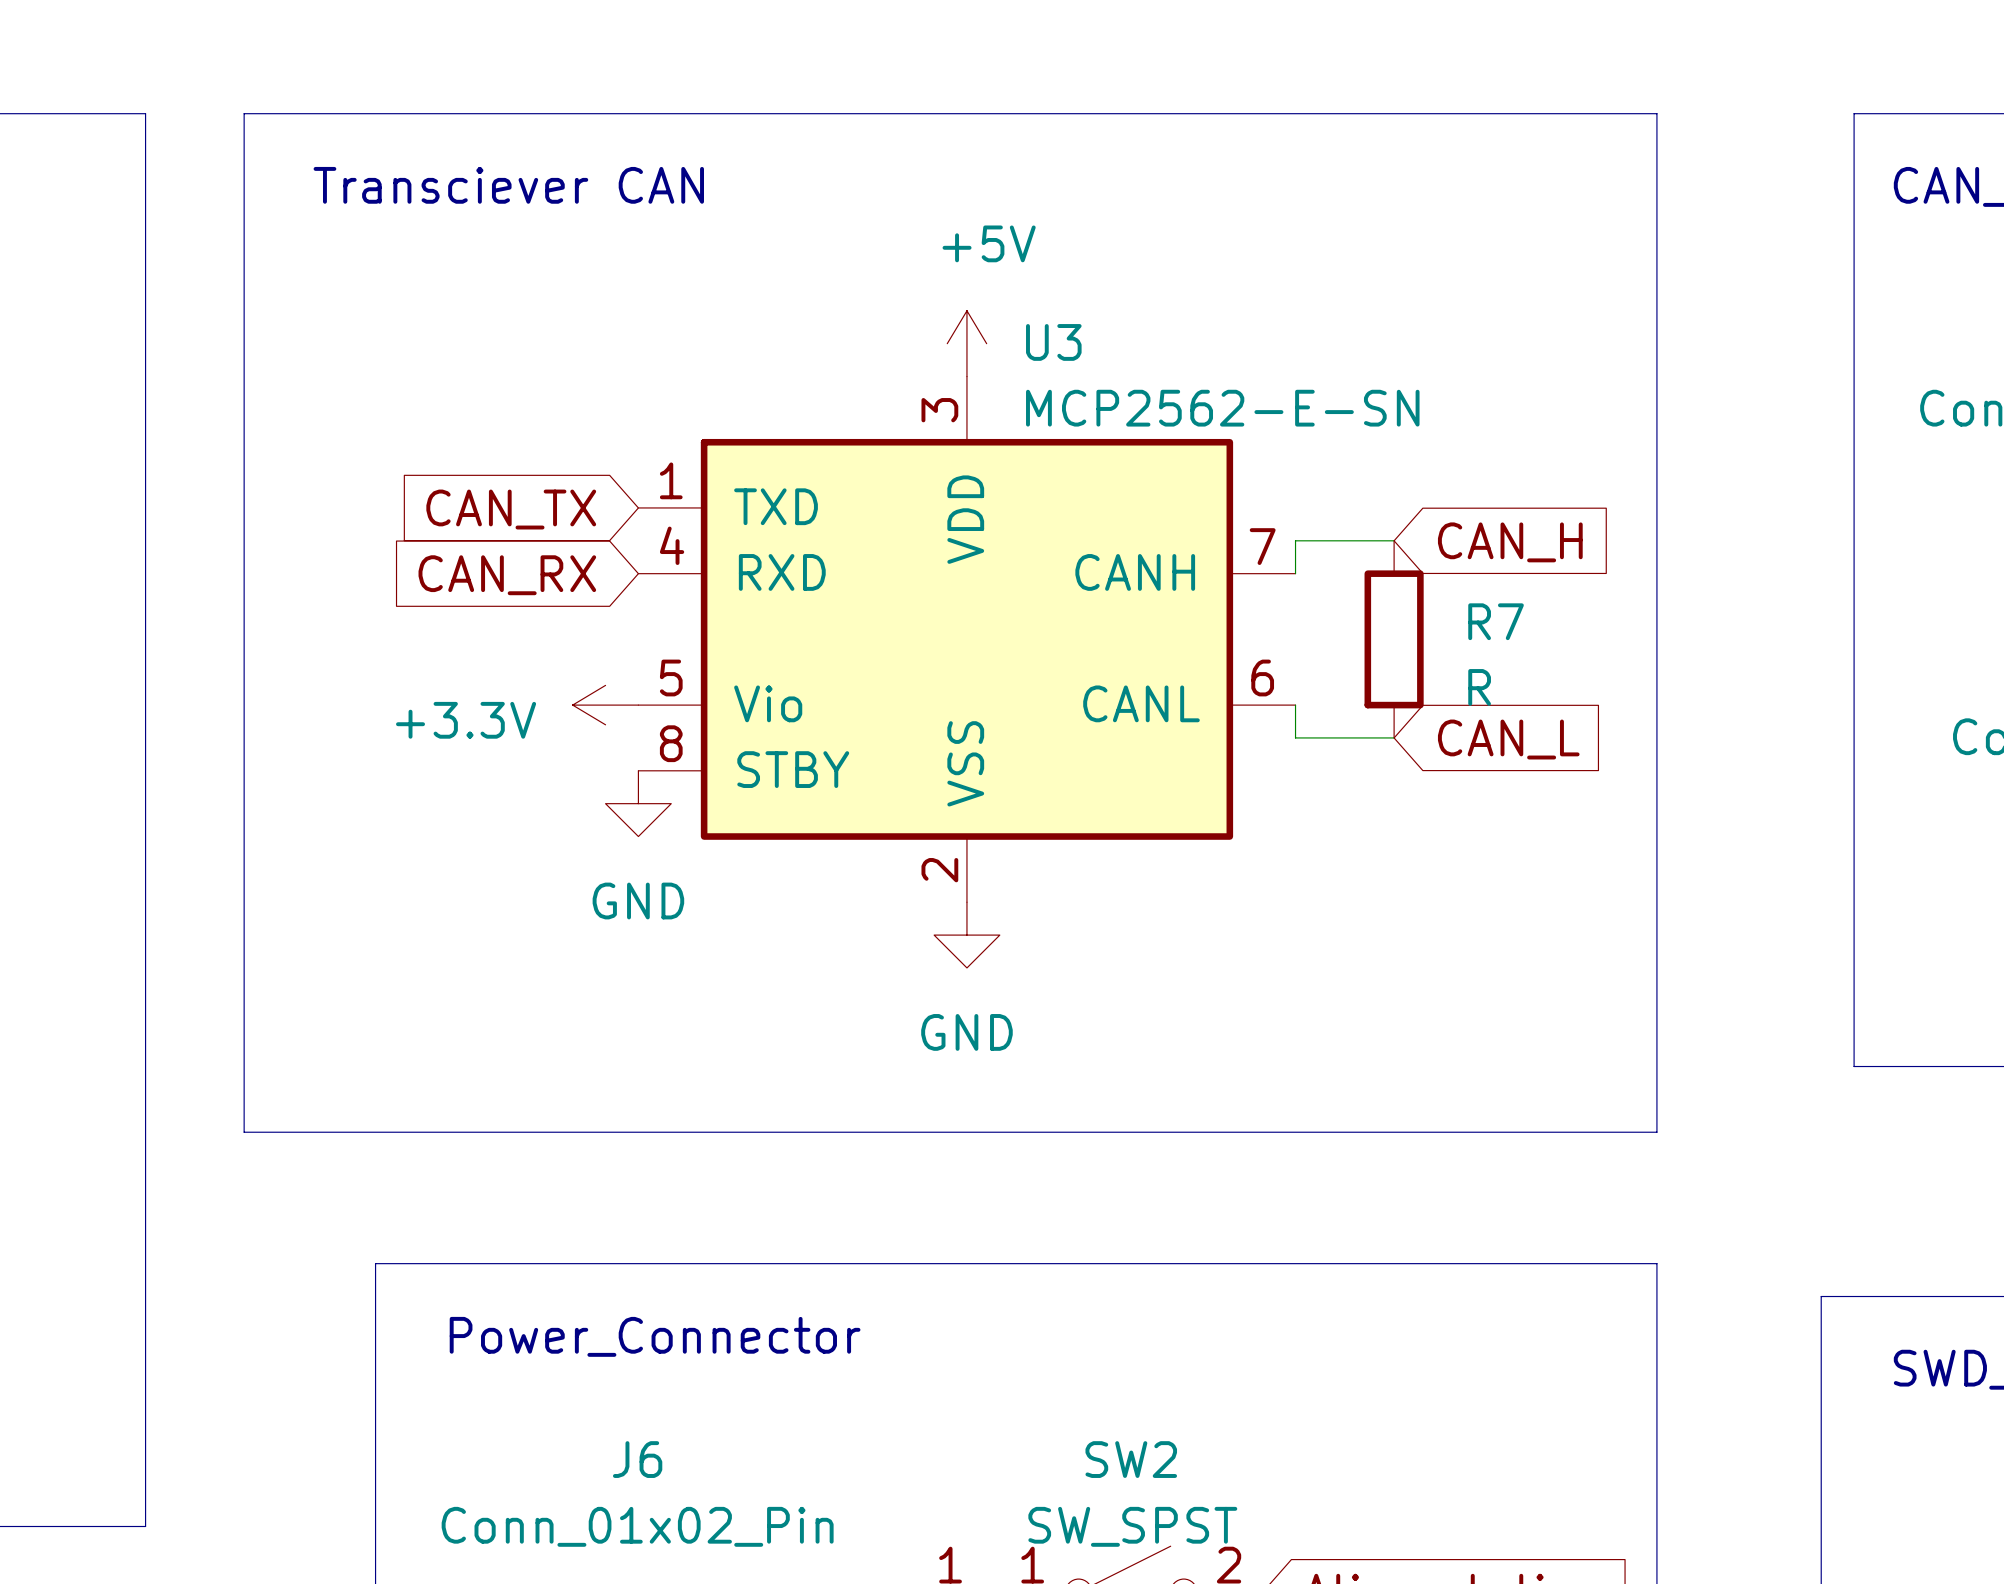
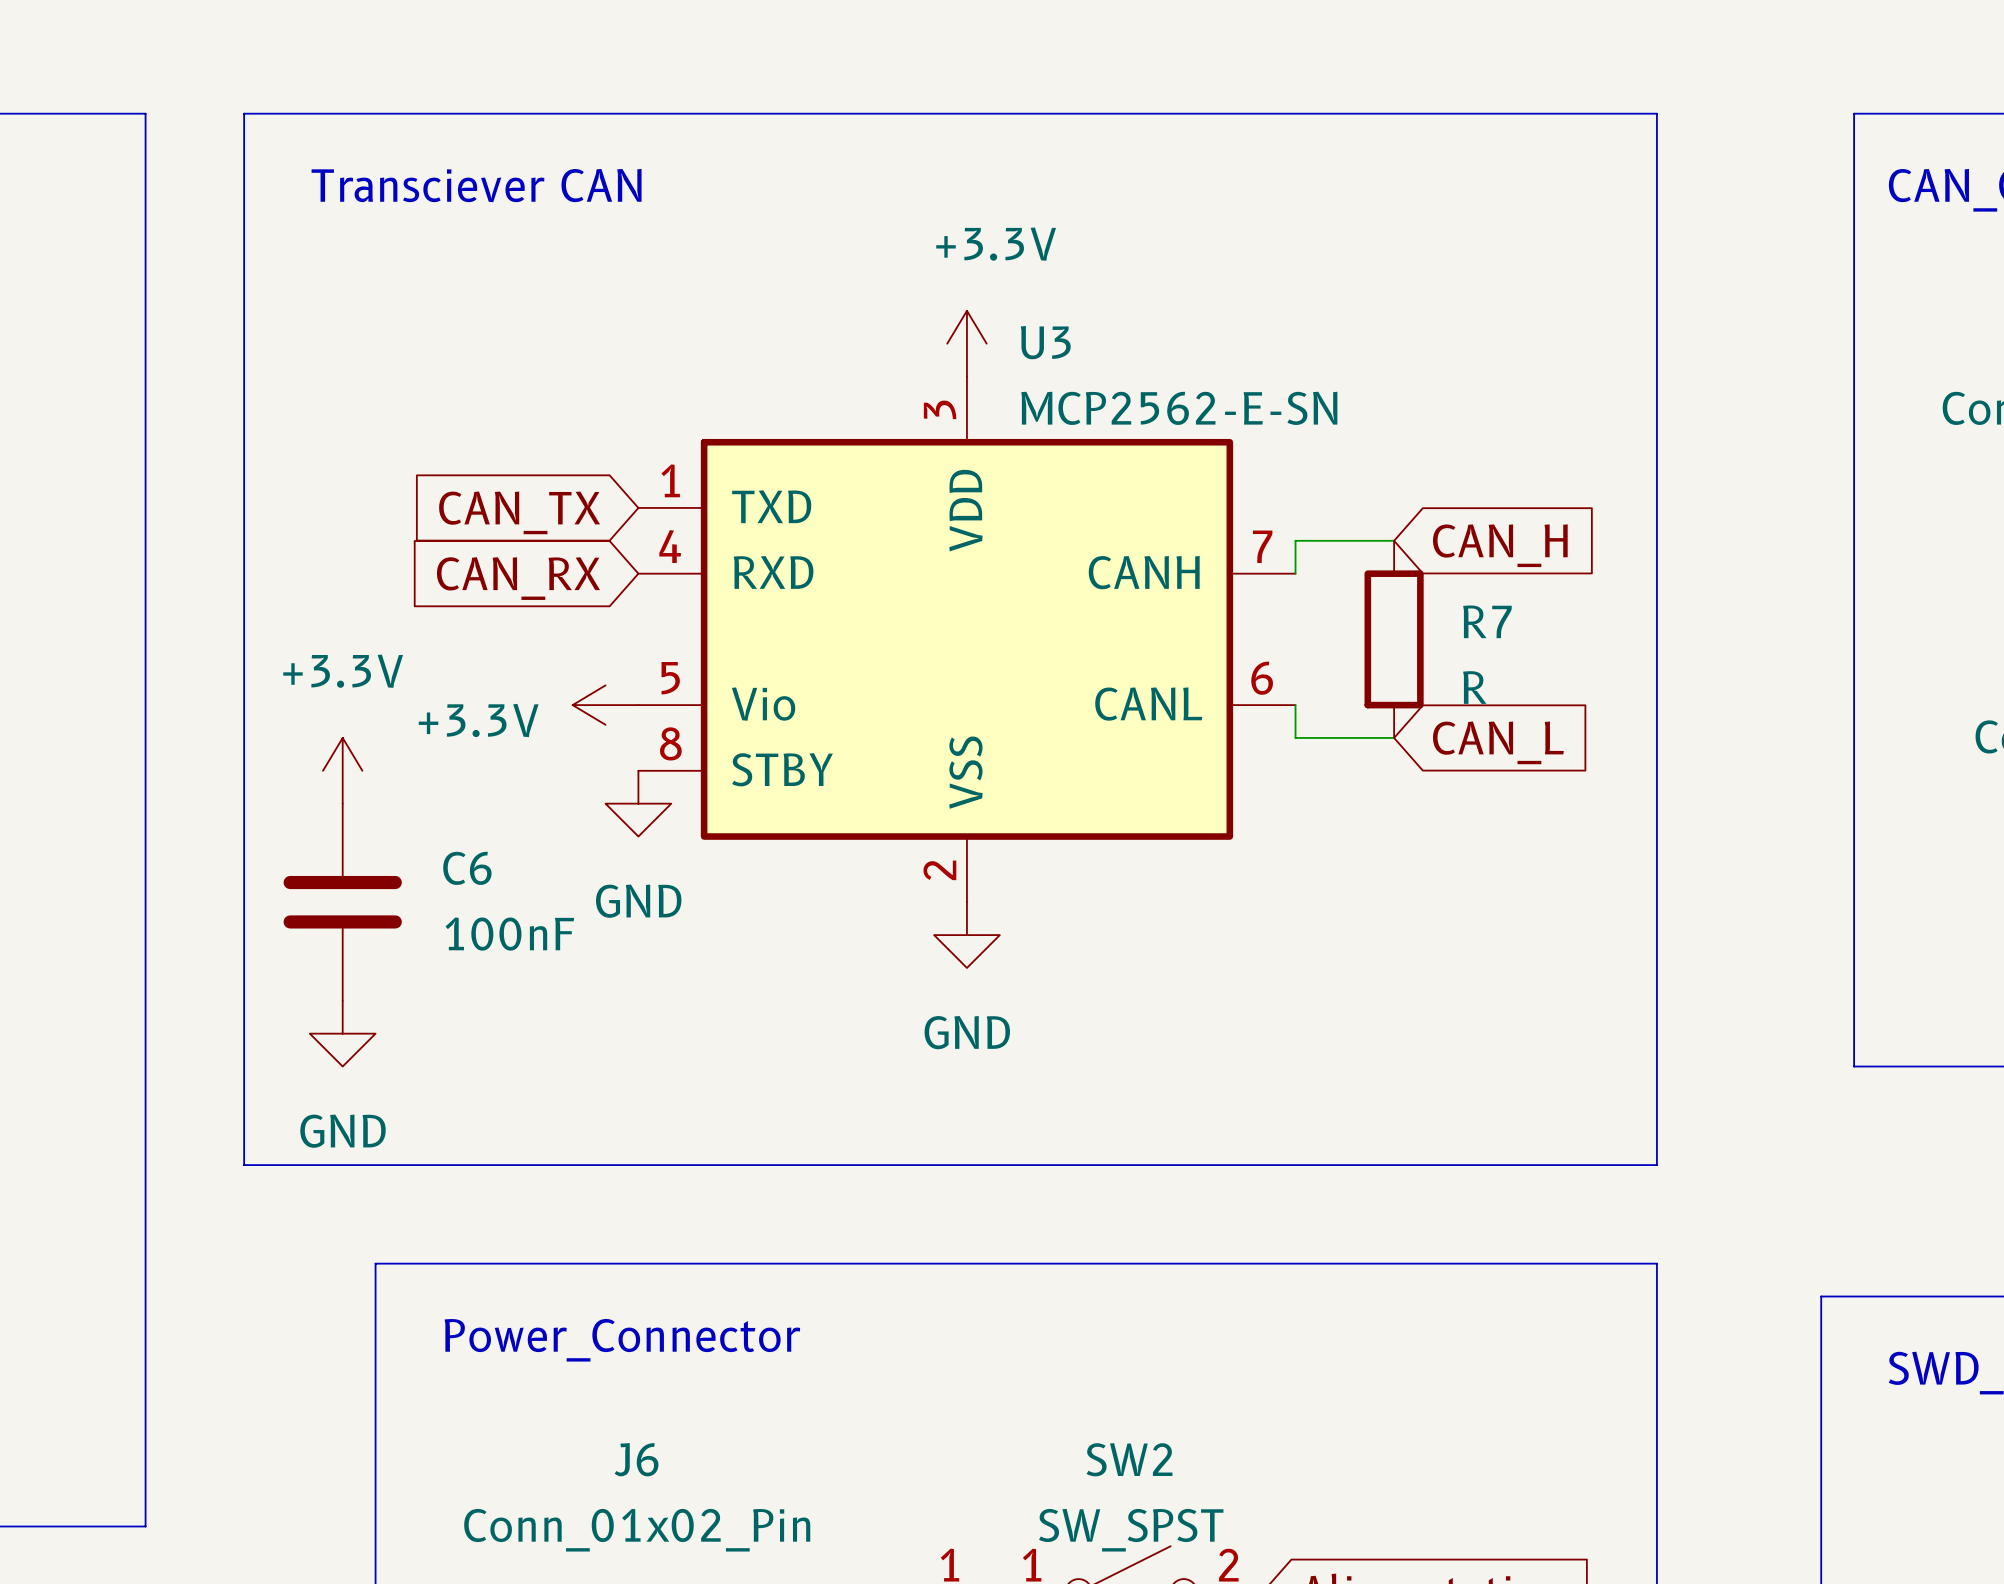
power symbol: +5V (966, 343) -> +3.3V (966, 343)
power symbol: none -> +3.3V (342, 770)
C6: none -> 100nF (342, 902)
power symbol: none -> GND (342, 1033)
line: (244, 1132) (1656, 1132) -> (244, 1132) (244, 1165) (1656, 1165) (1656, 1132)

